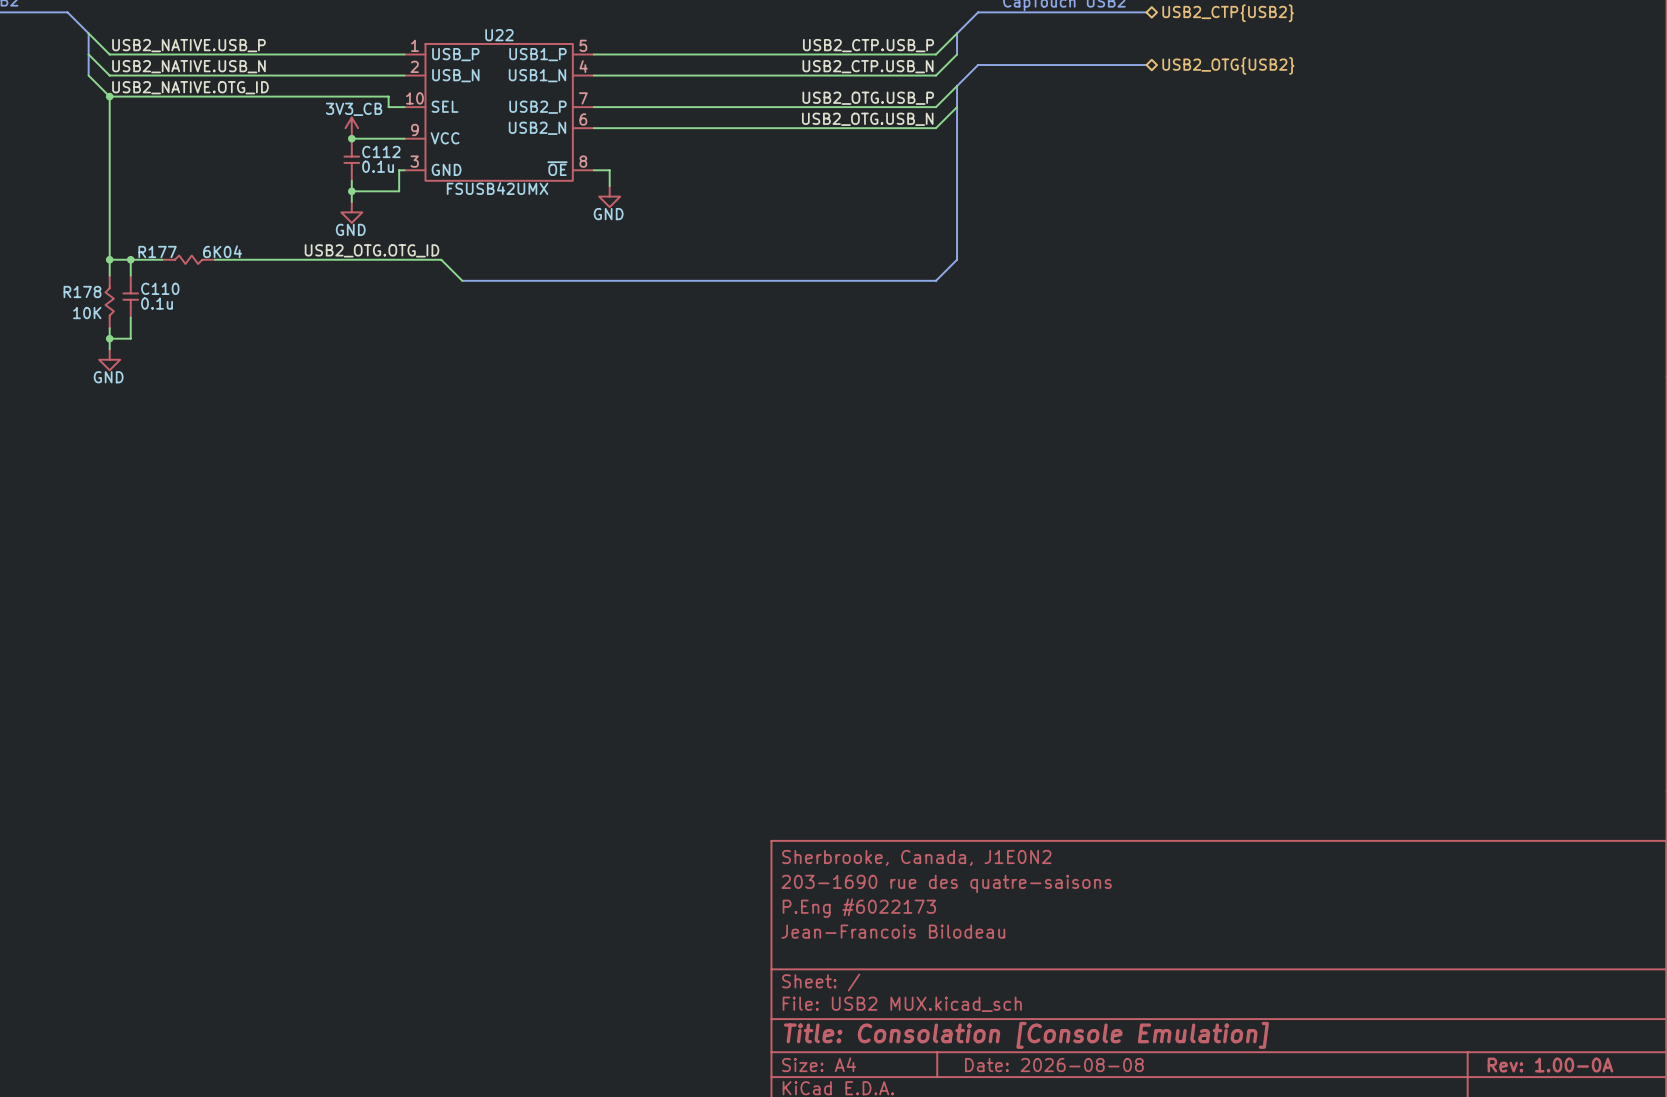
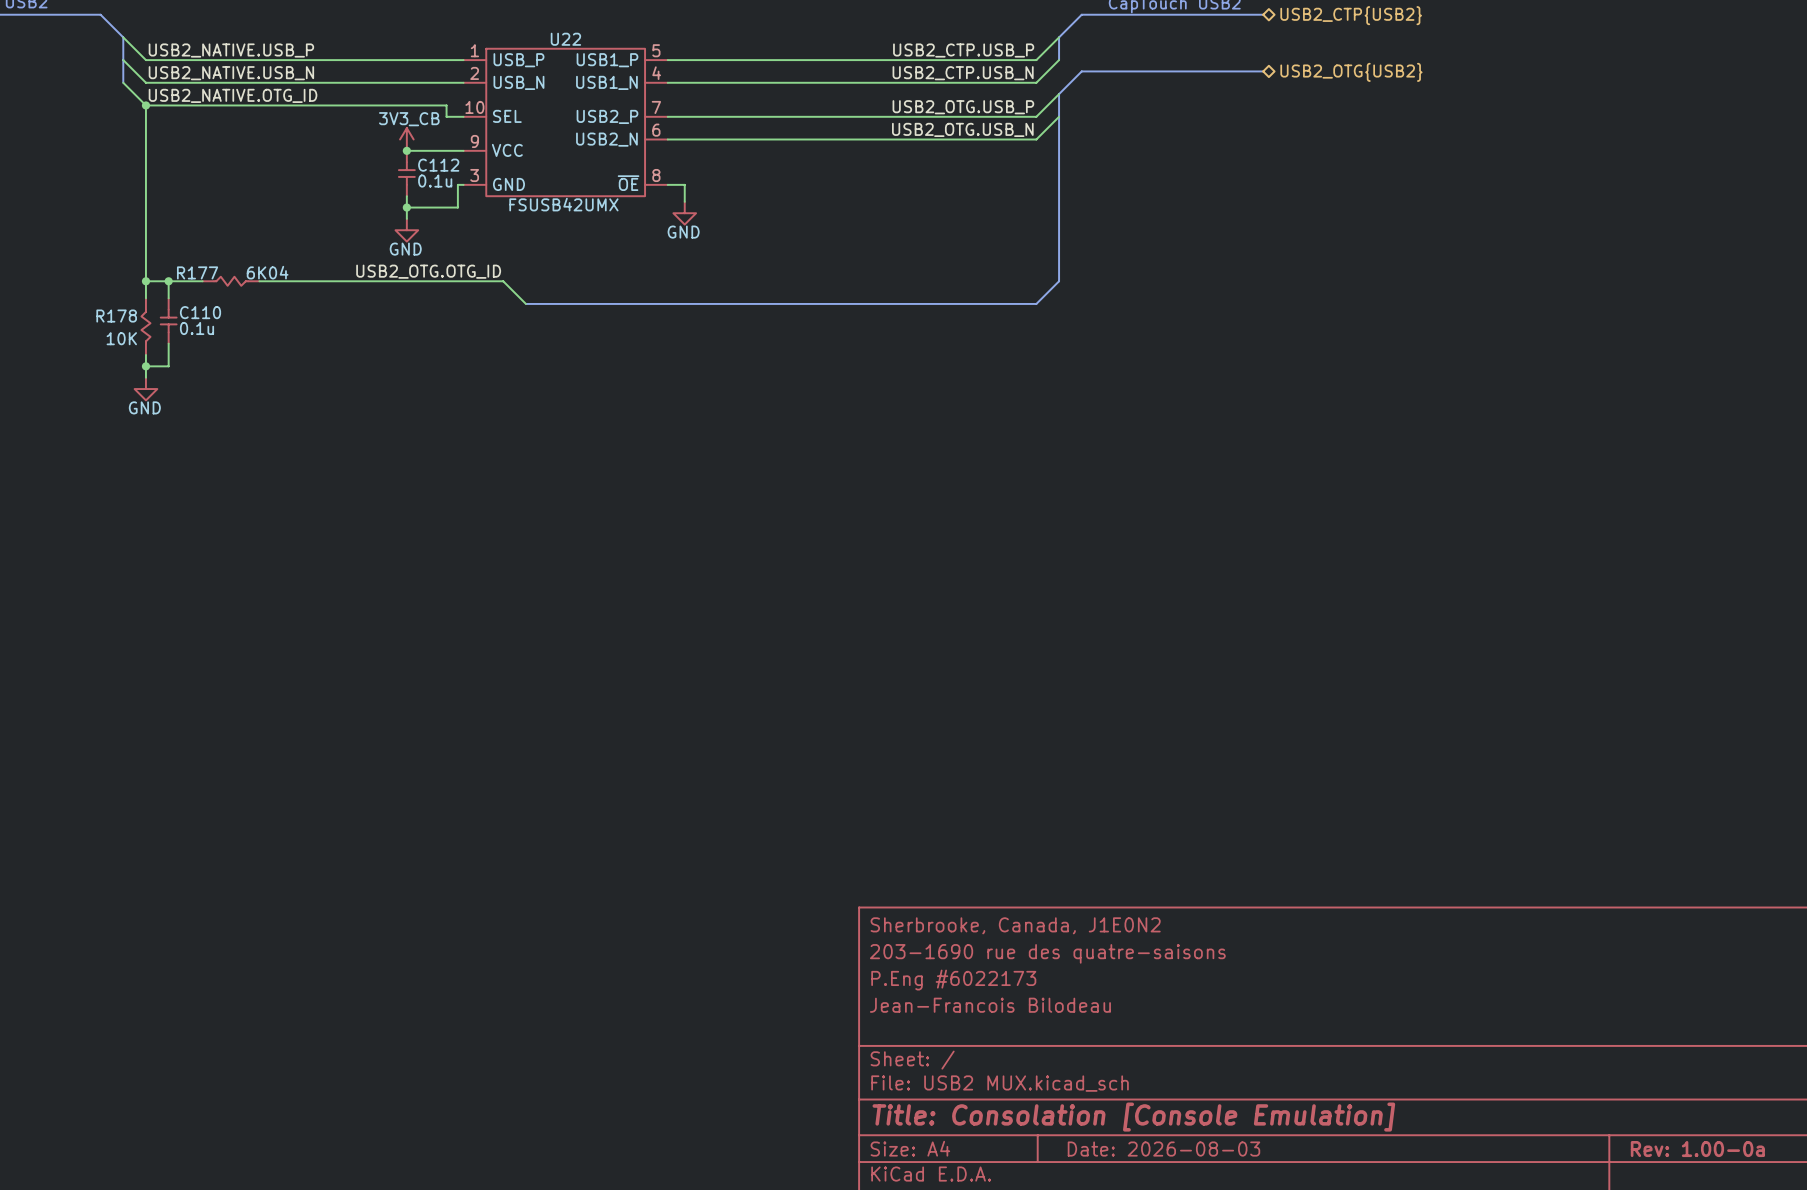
title block: Date: 2026-08-08 (1054, 1065) -> Date: 2026-08-03 (1163, 1149)
title block: Rev: 1.00-0A (1550, 1065) -> Rev: 1.00-0a (1697, 1149)

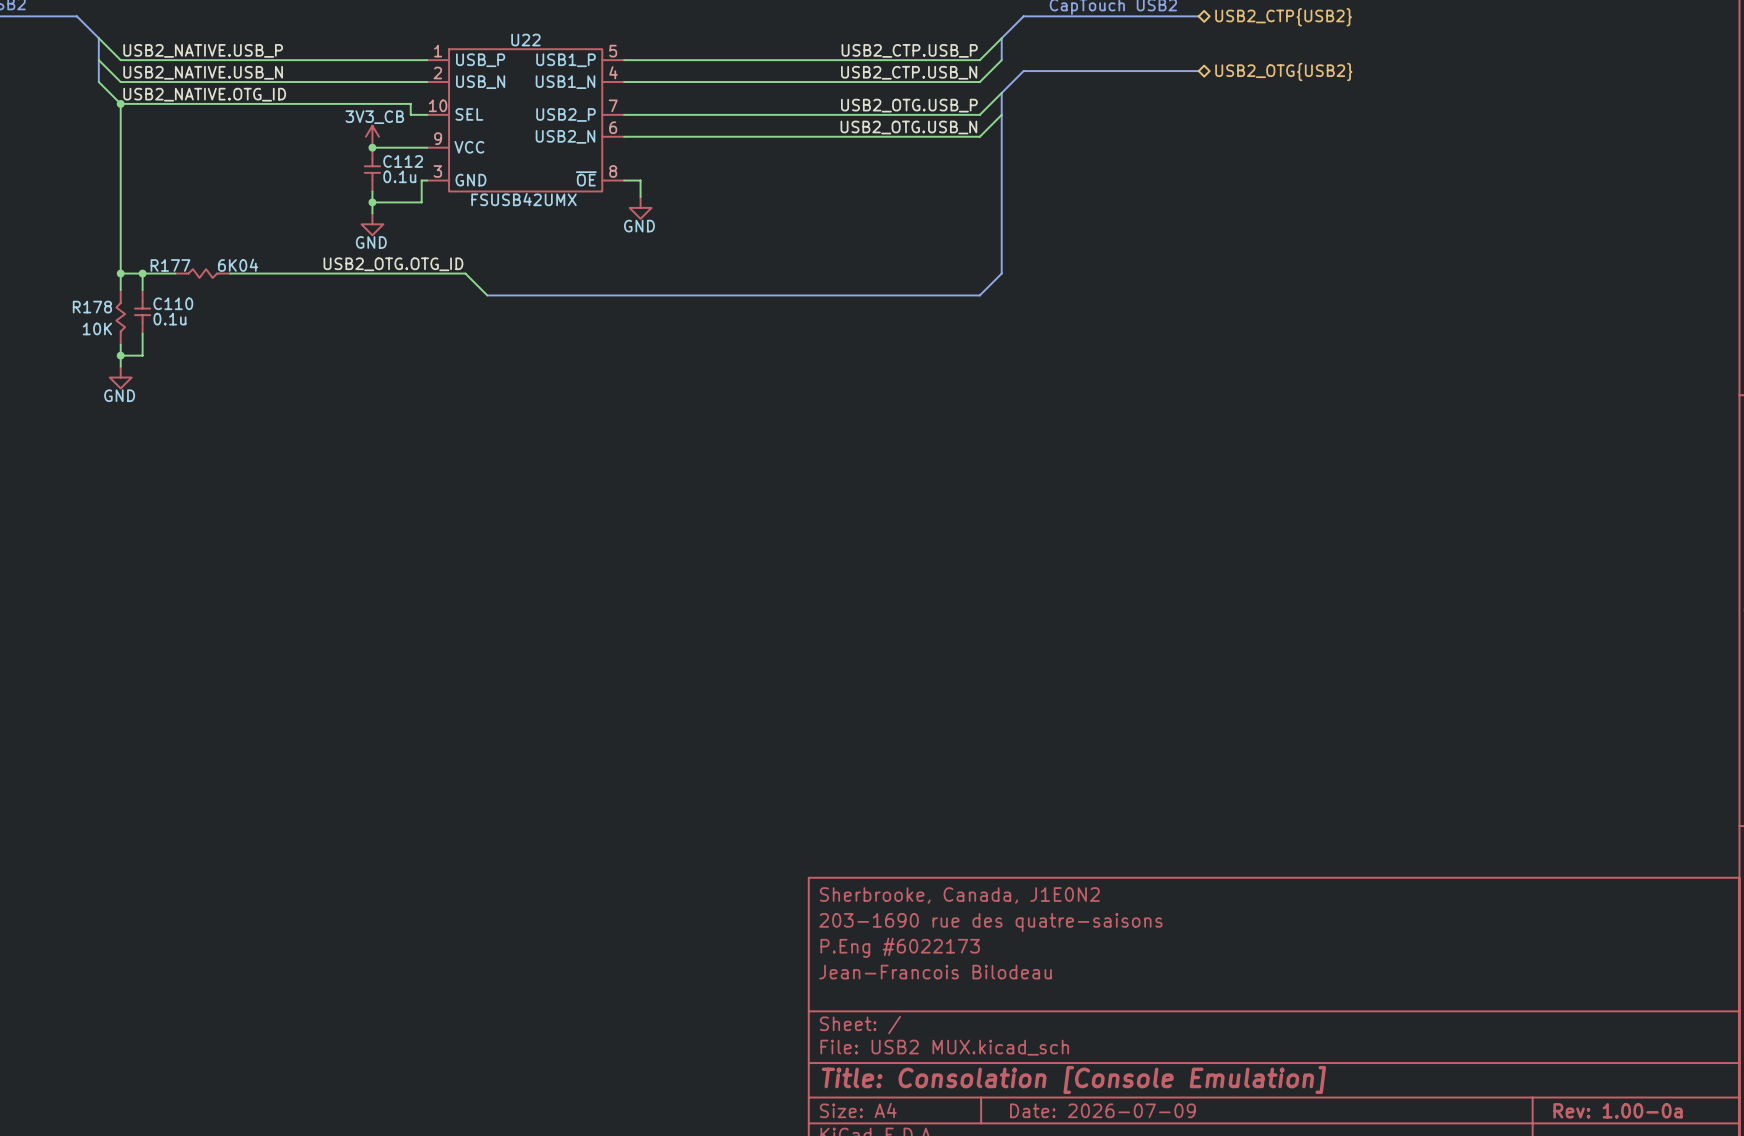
title block: Date: 2026-08-03 (1163, 1149) -> Date: 2026-07-09 (1102, 1110)

